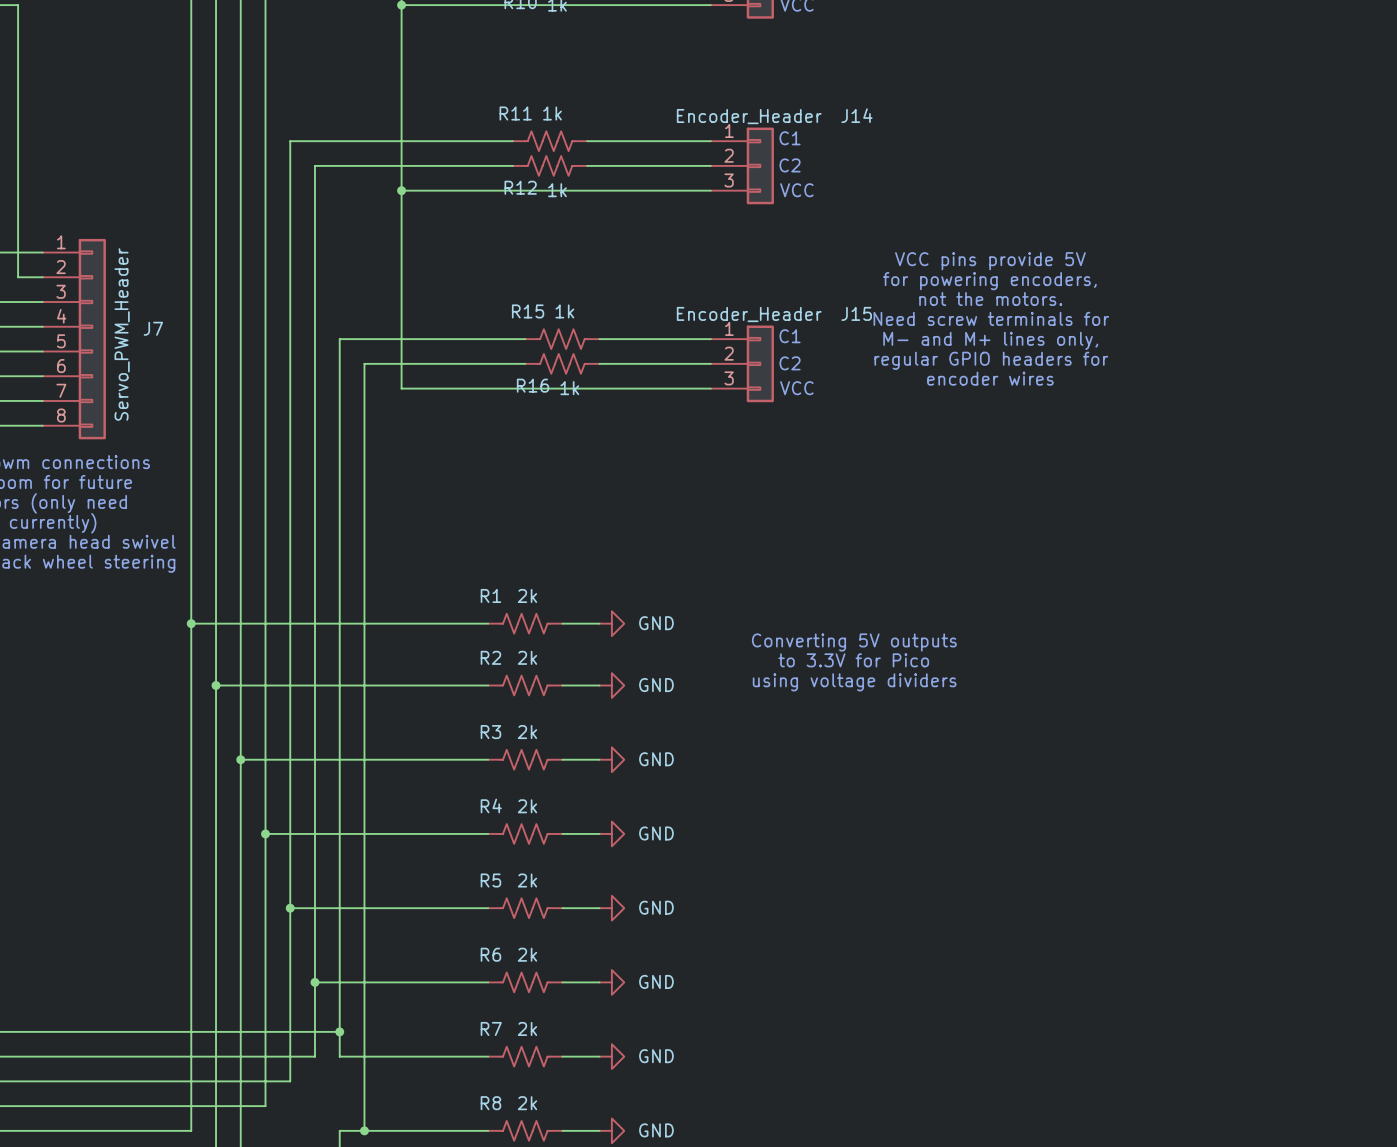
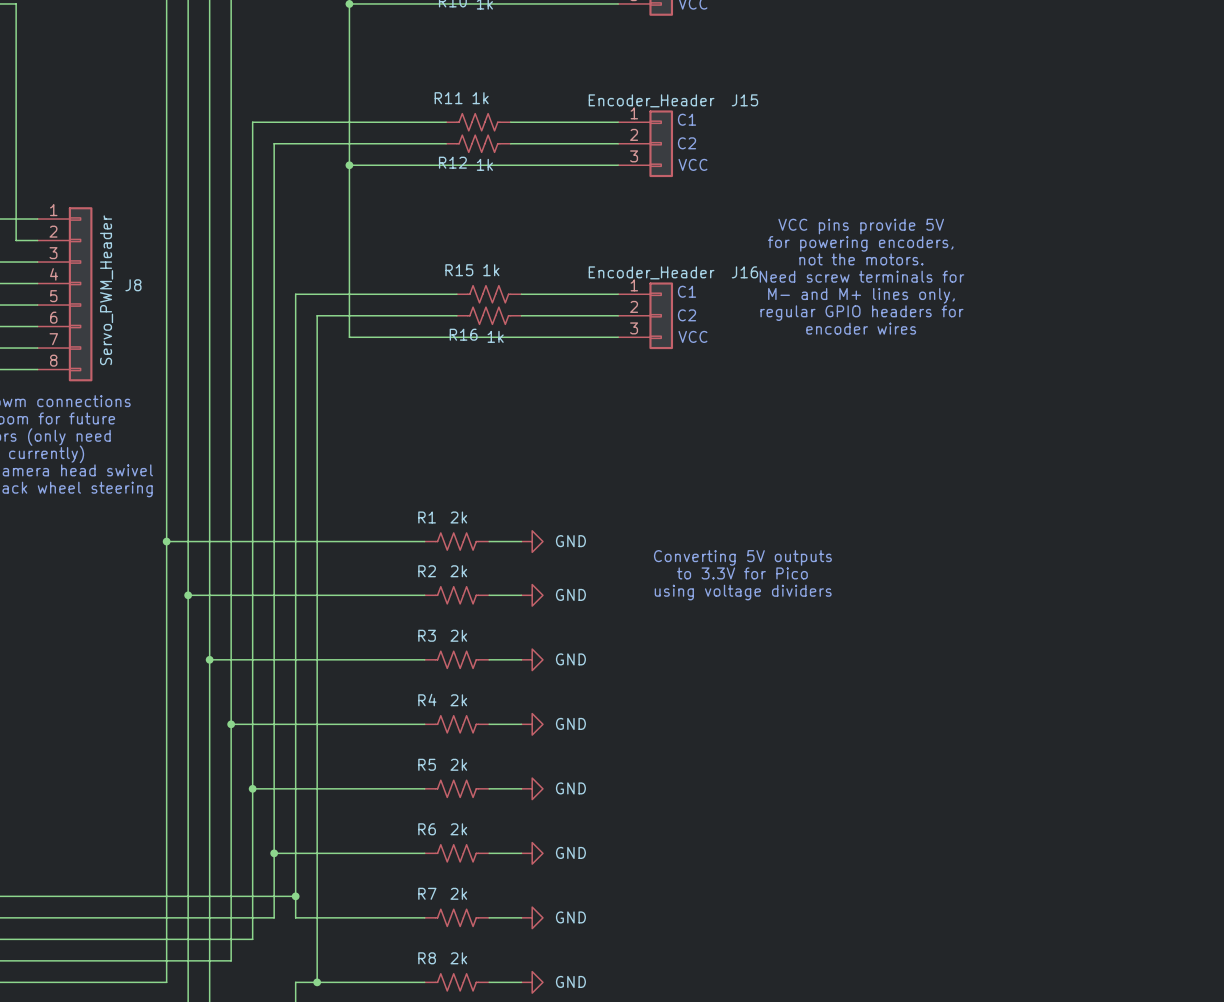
J14 name: J14 (856, 115) -> J15 (744, 100)
J15 name: J15 (856, 313) -> J16 (744, 272)
J7 name: J7 (153, 328) -> J8 (133, 285)

